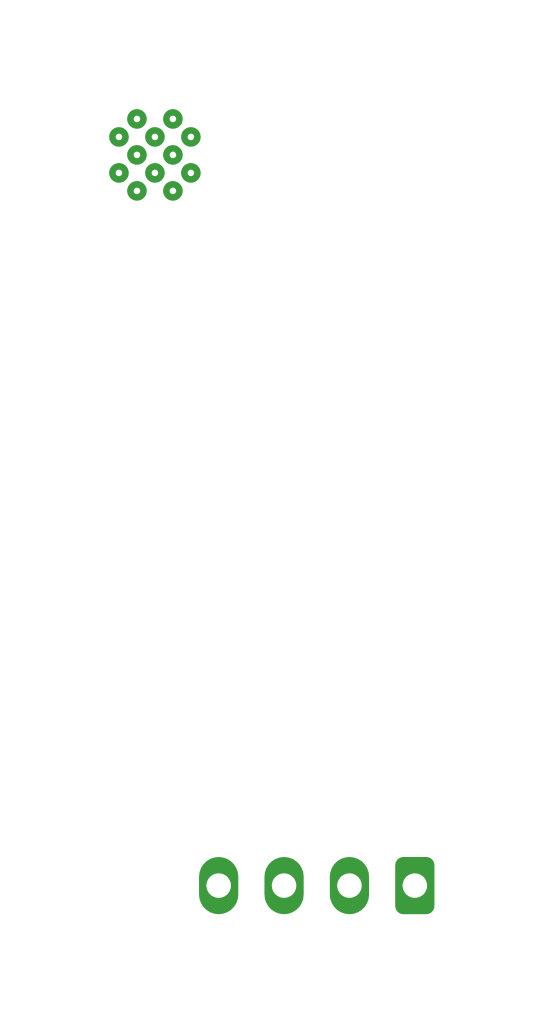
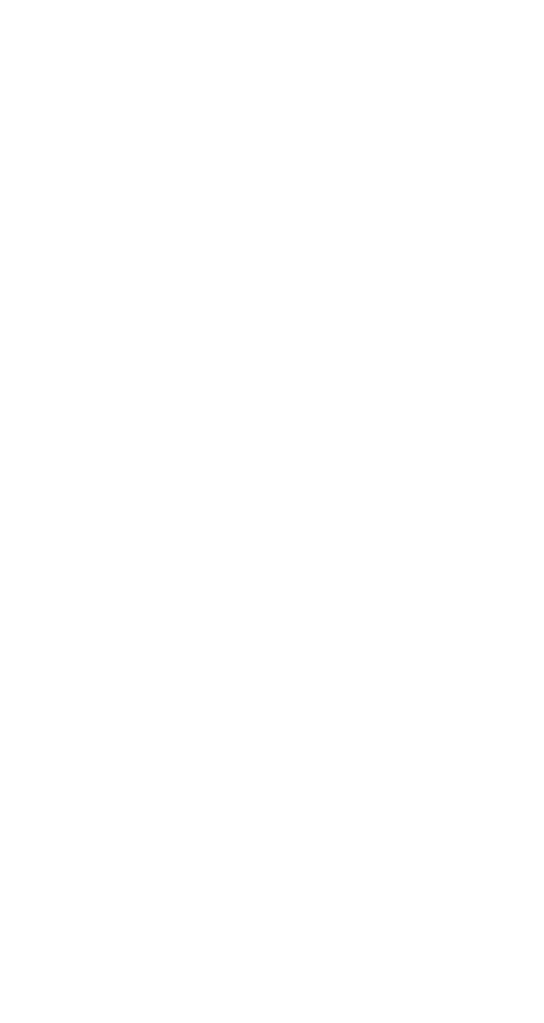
part: (154, 154) -> none
part: (316, 885) -> none

